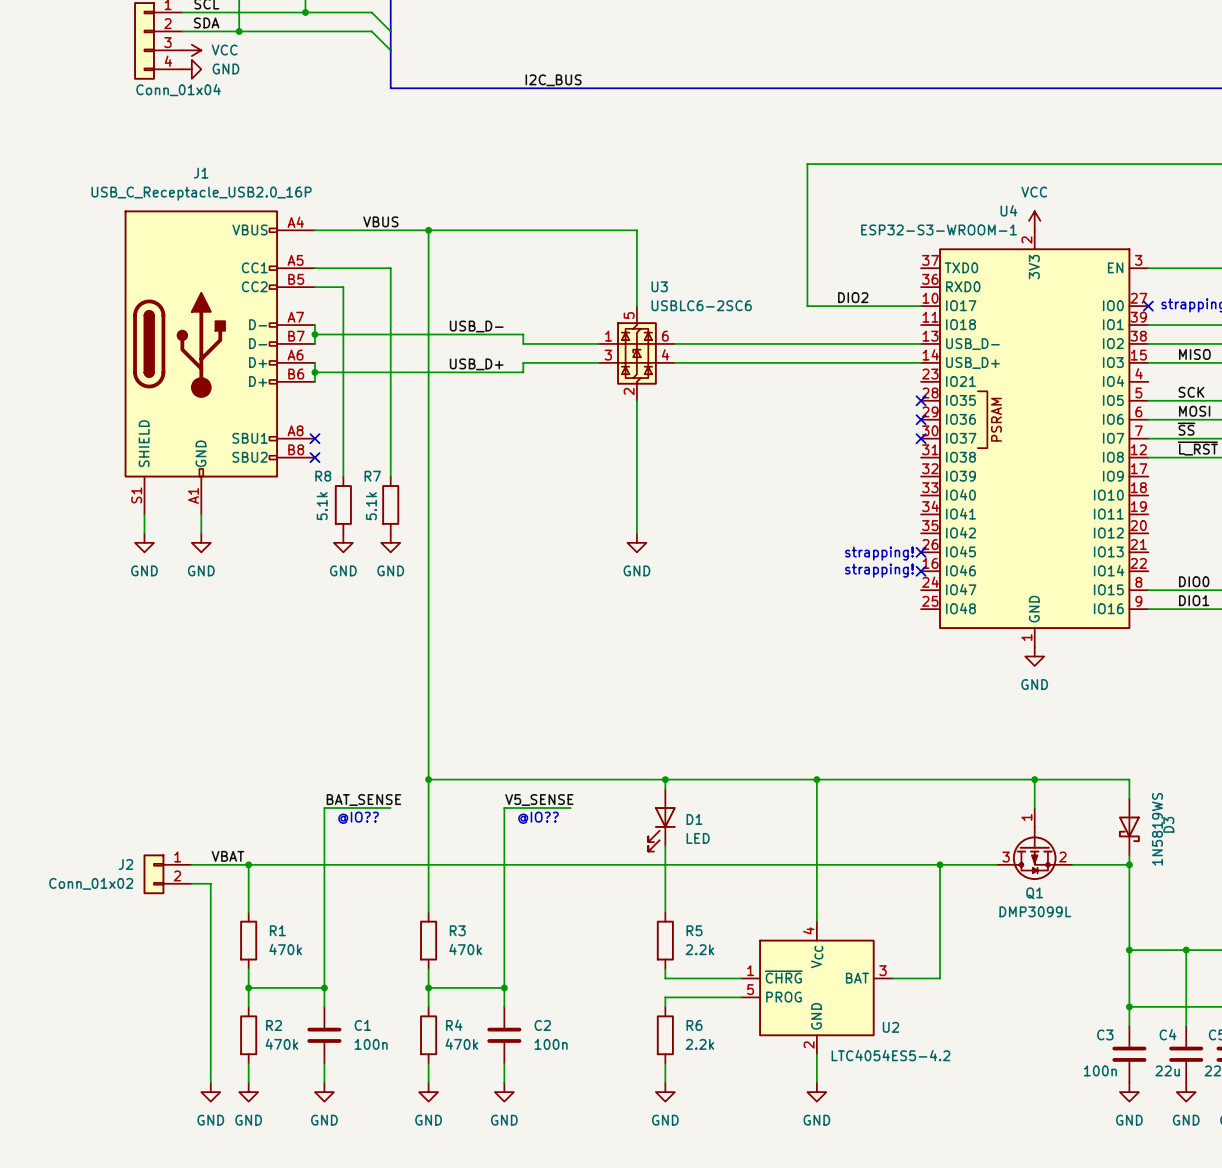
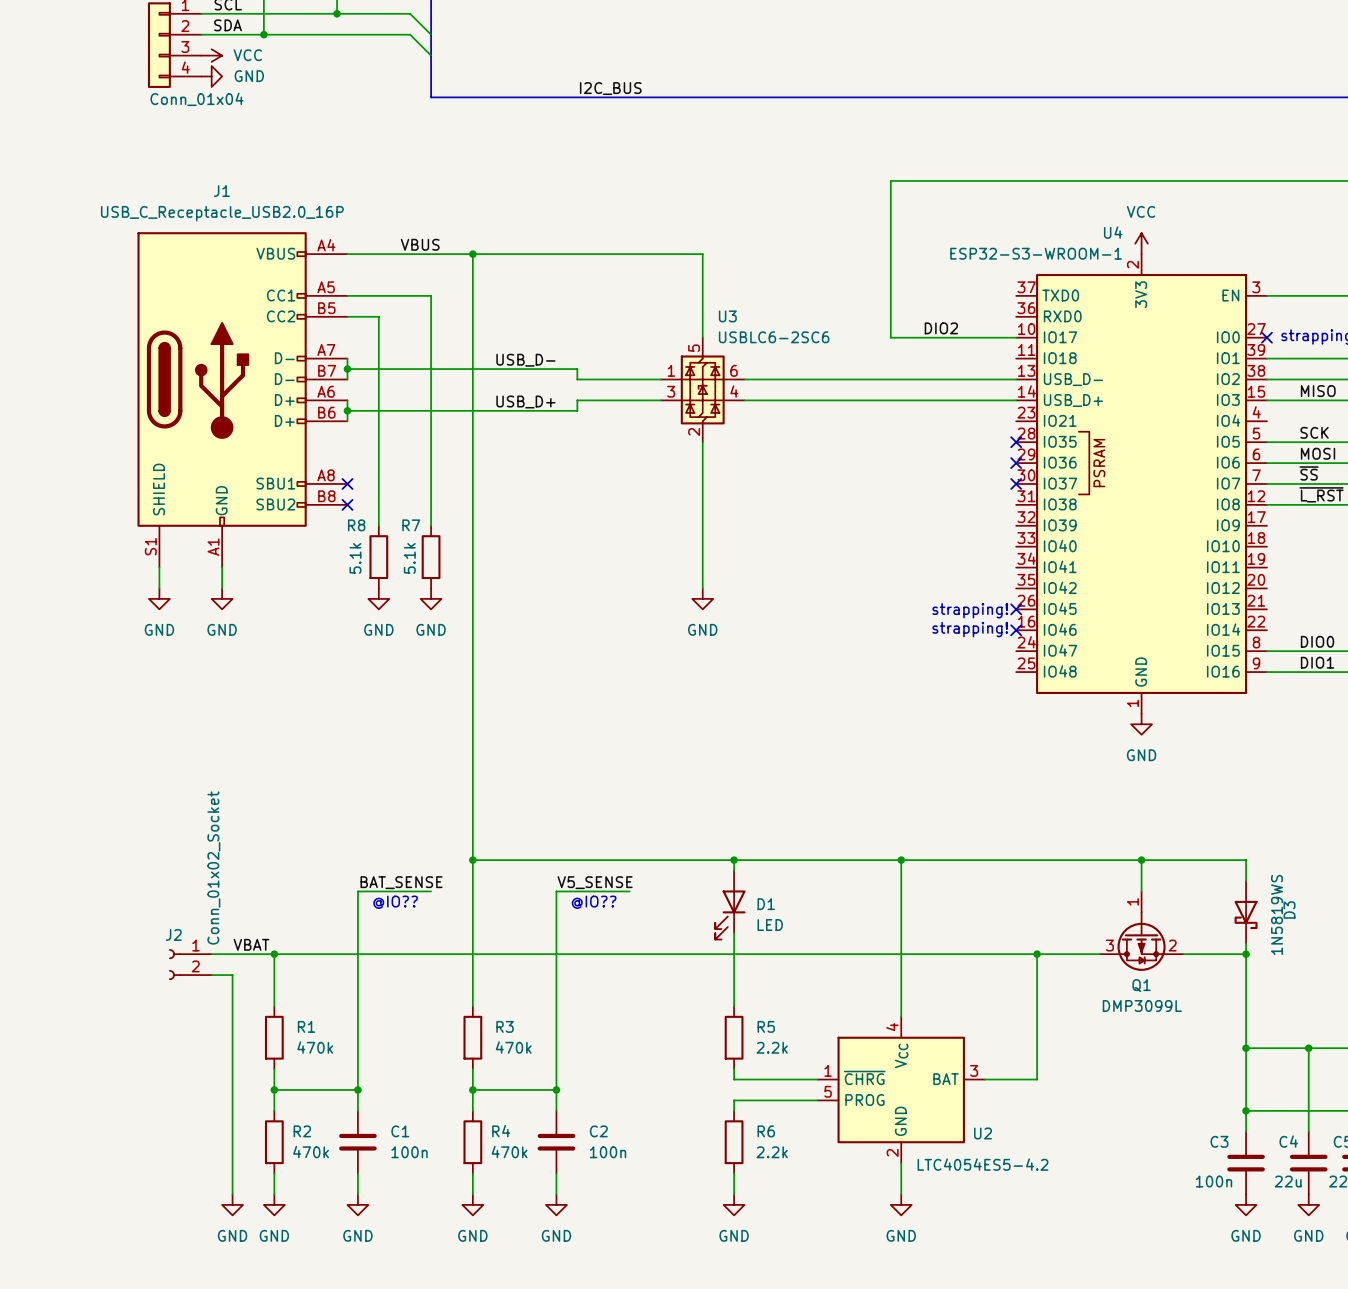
J2 symbol: [143, 854, 192, 895] -> [169, 949, 212, 980]
J2 name position: J2 (125, 864) -> J2 (173, 934)
J2 value: Conn_01x02 (91, 883) -> Conn_01x02_Socket (213, 867)

